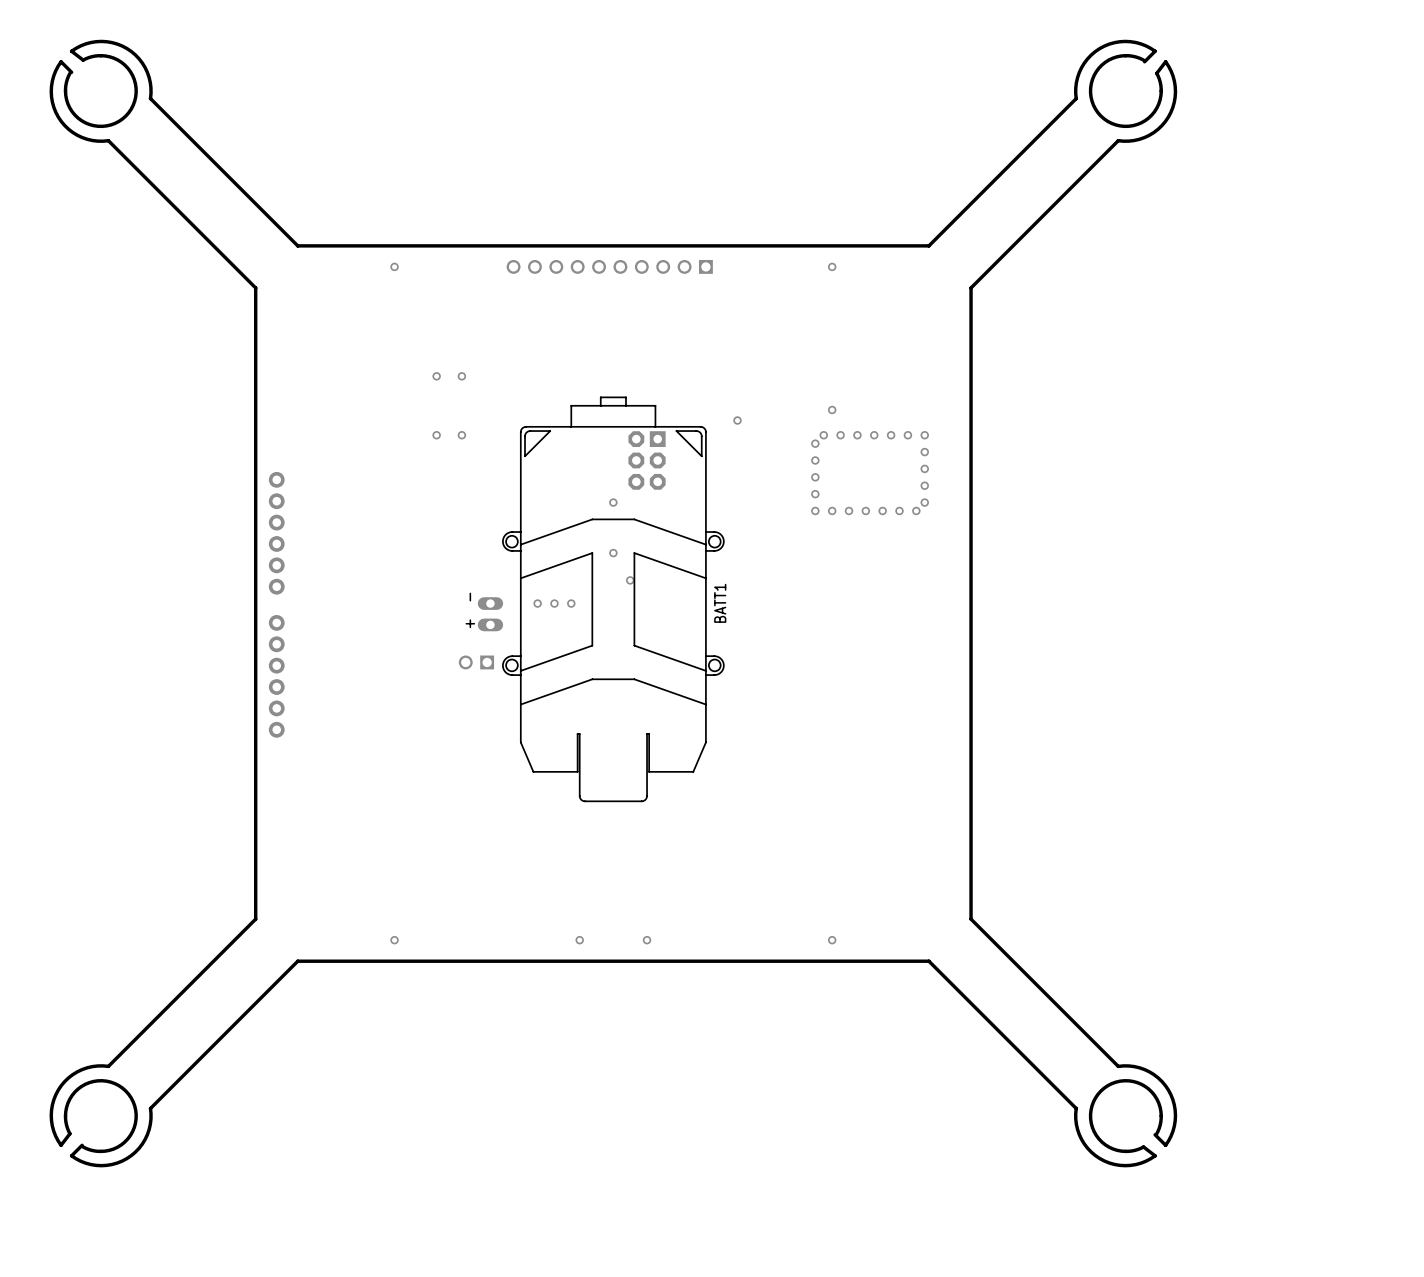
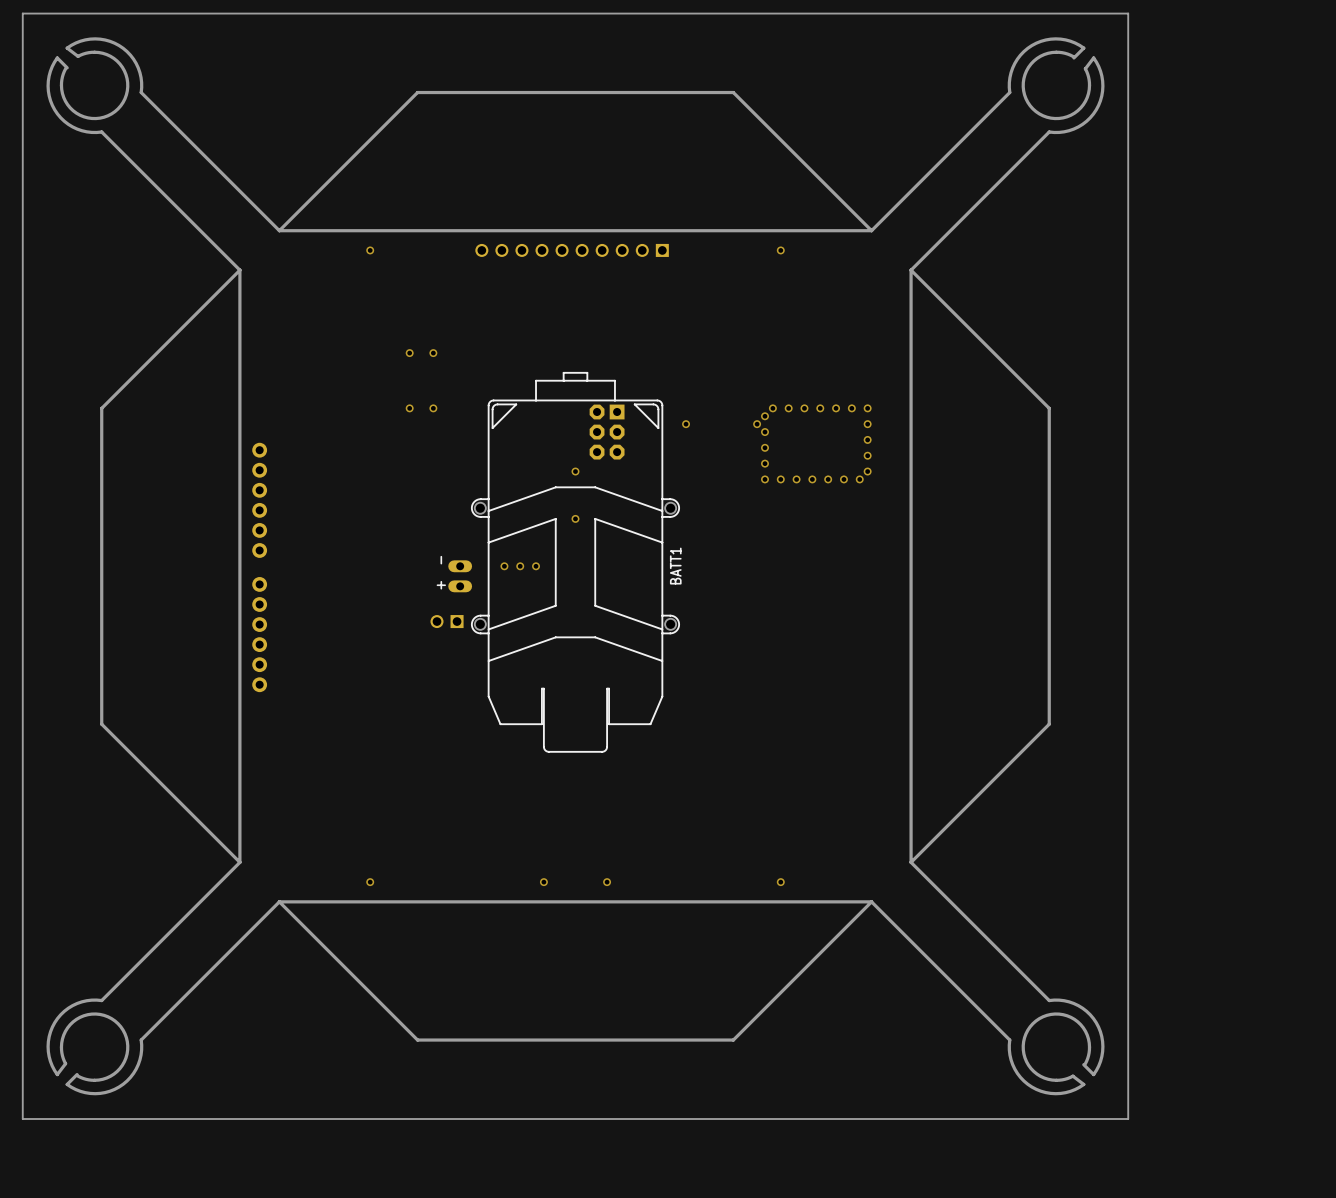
board edge: none -> (1128, 13) (22, 13) (22, 1119) (1128, 1119) (1128, 13)
board edge: none -> (871, 230) (733, 92) (417, 92) (279, 230)
board edge: none -> (239, 270) (101, 408) (101, 724) (239, 862)
board edge: none -> (911, 270) (1049, 408) (1049, 724) (911, 862)
via: (832, 409) -> none
via position: (737, 420) -> (686, 424)
via: none -> (757, 424)
via: (630, 580) -> none
board edge: none -> (871, 901) (733, 1040) (417, 1040) (279, 901)

